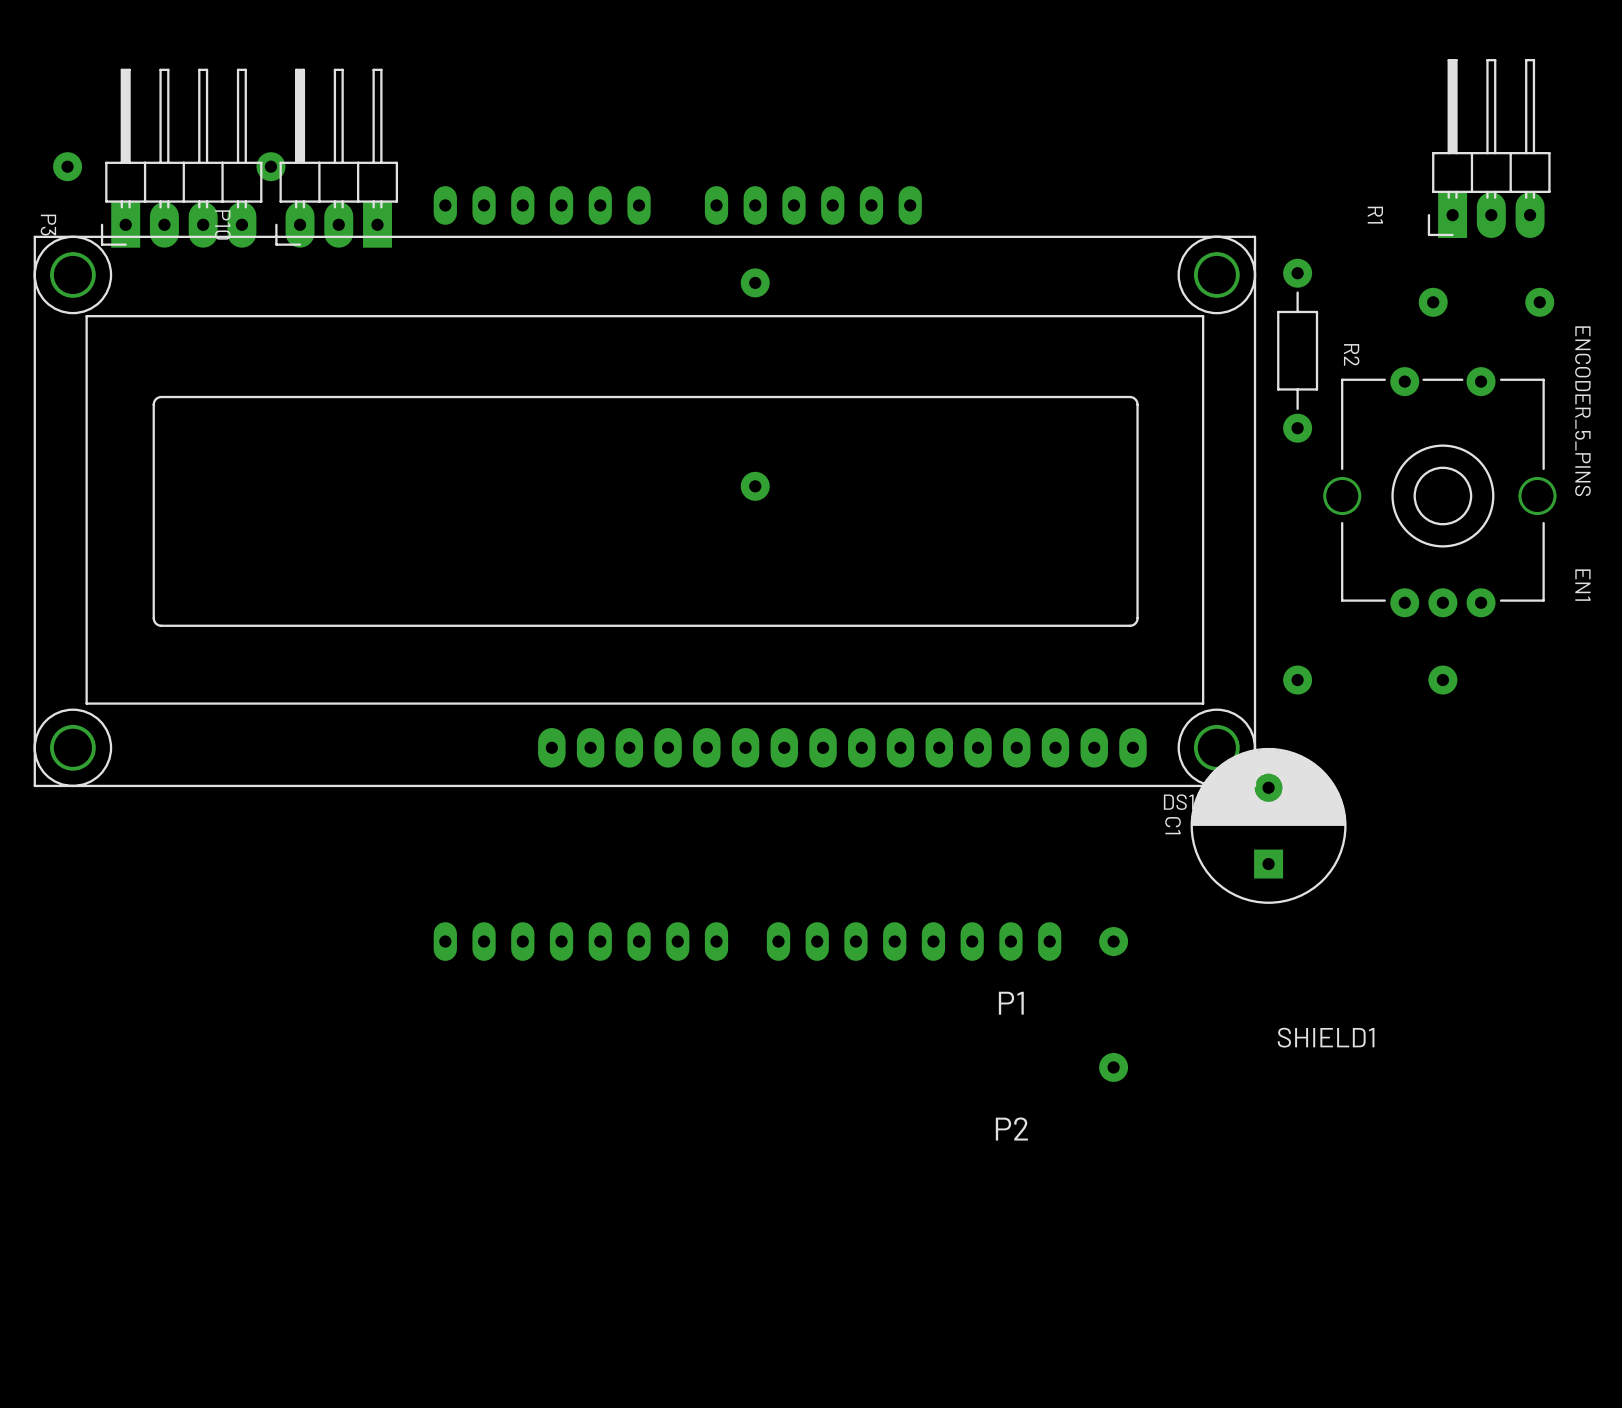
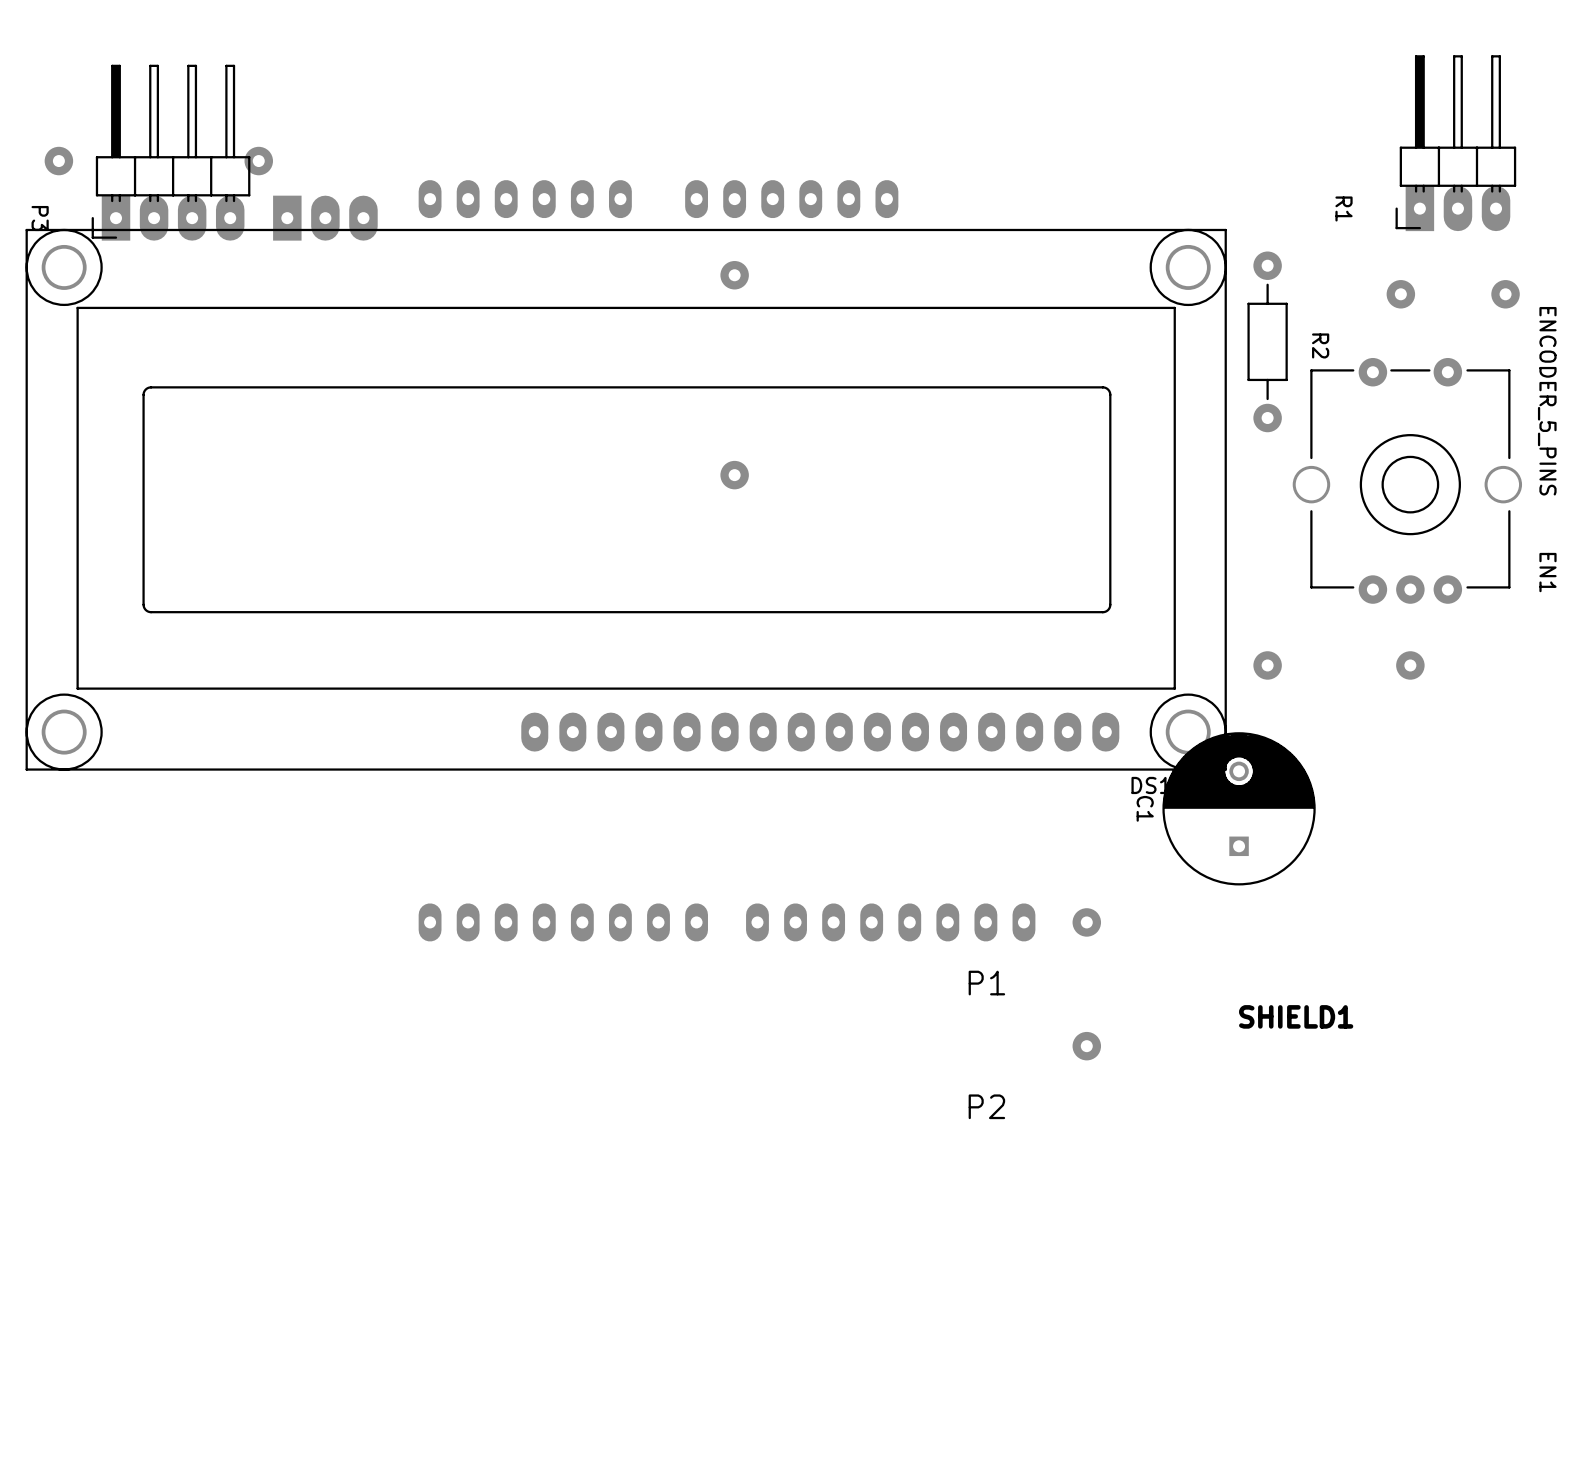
P10 side: bottom (336, 158) -> top (325, 218)
C1 footprint: [1190, 747, 1347, 904] -> [1162, 732, 1316, 886]

